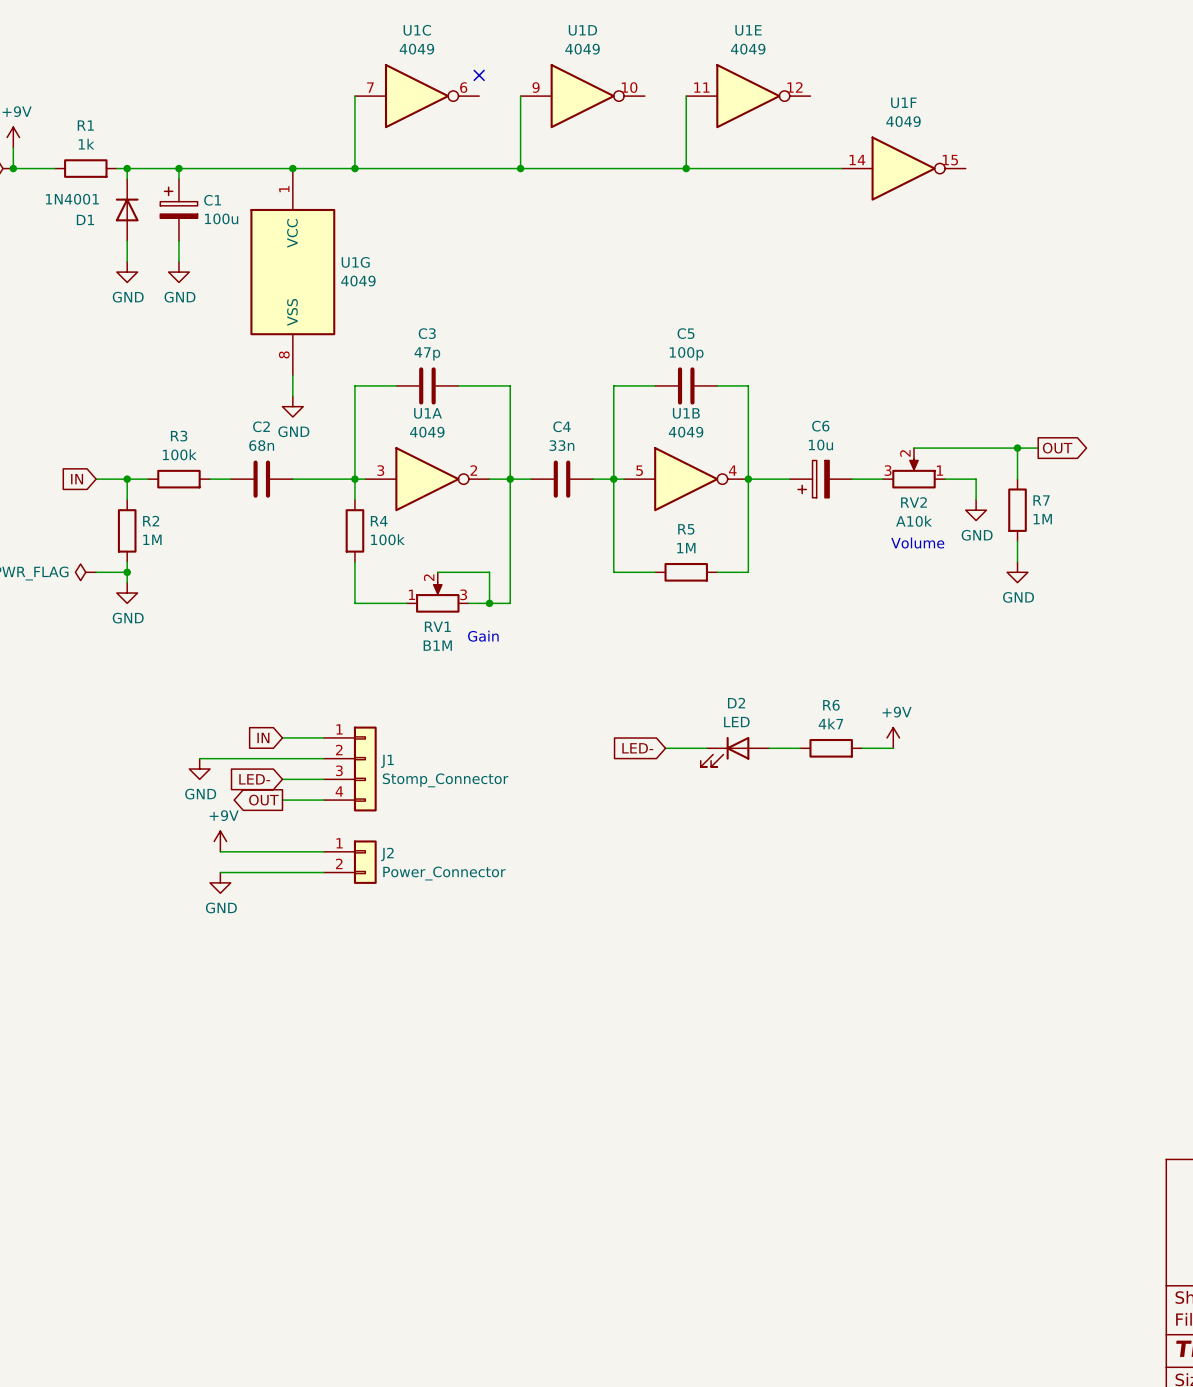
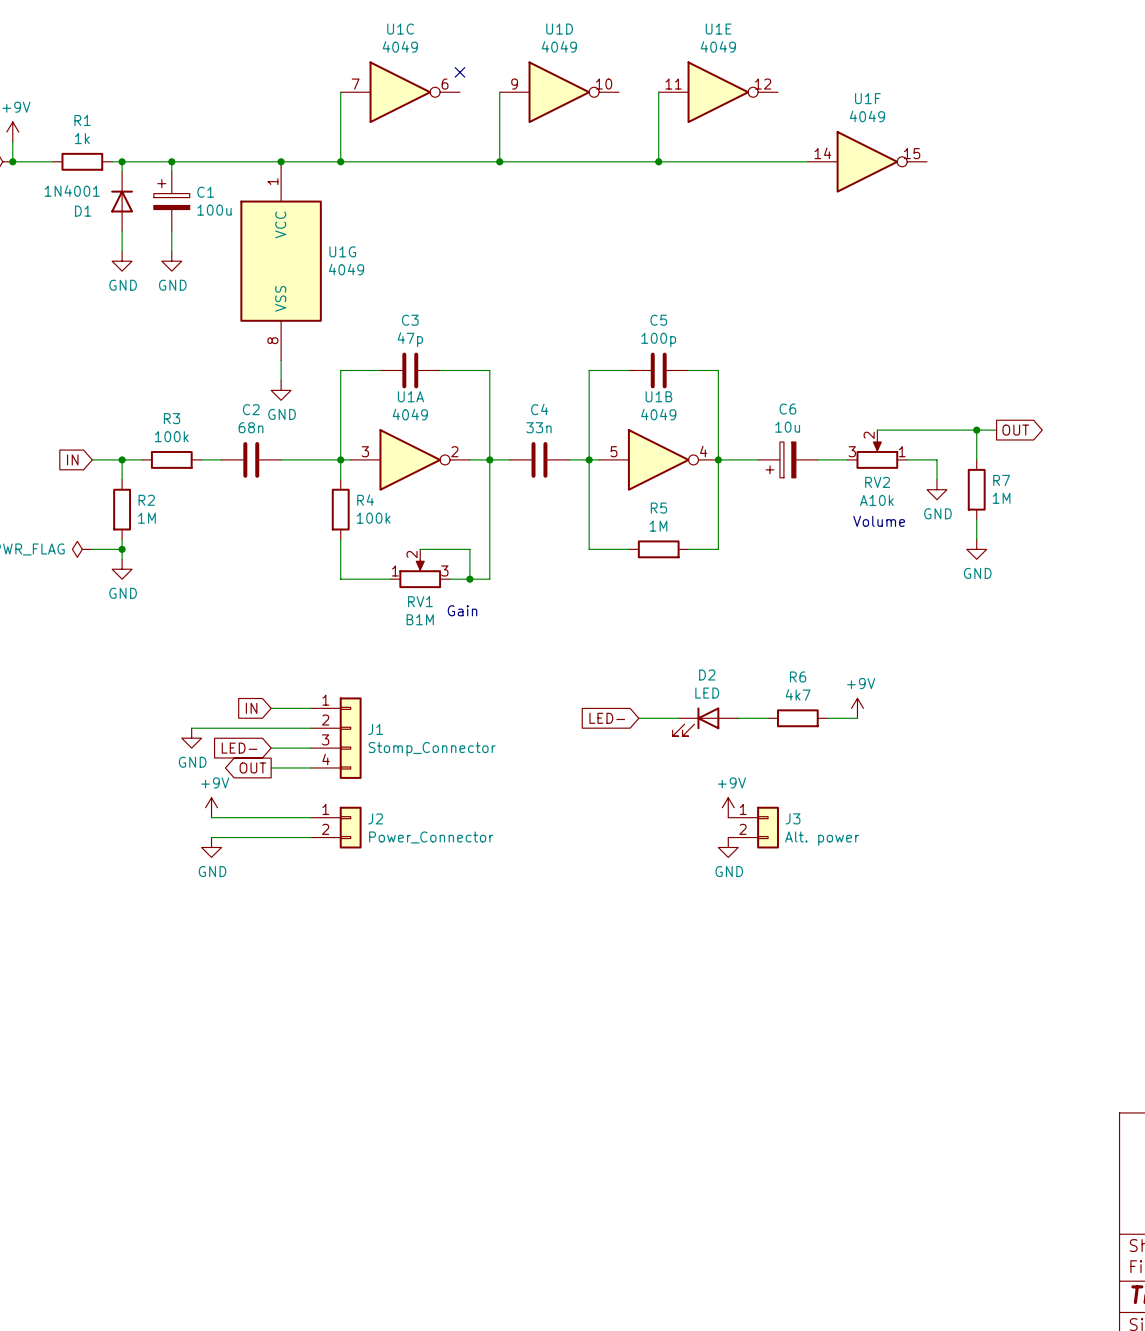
power symbol: none -> +9V (728, 807)
J3: none -> Alt. power (753, 827)
power symbol: none -> GND (728, 847)

